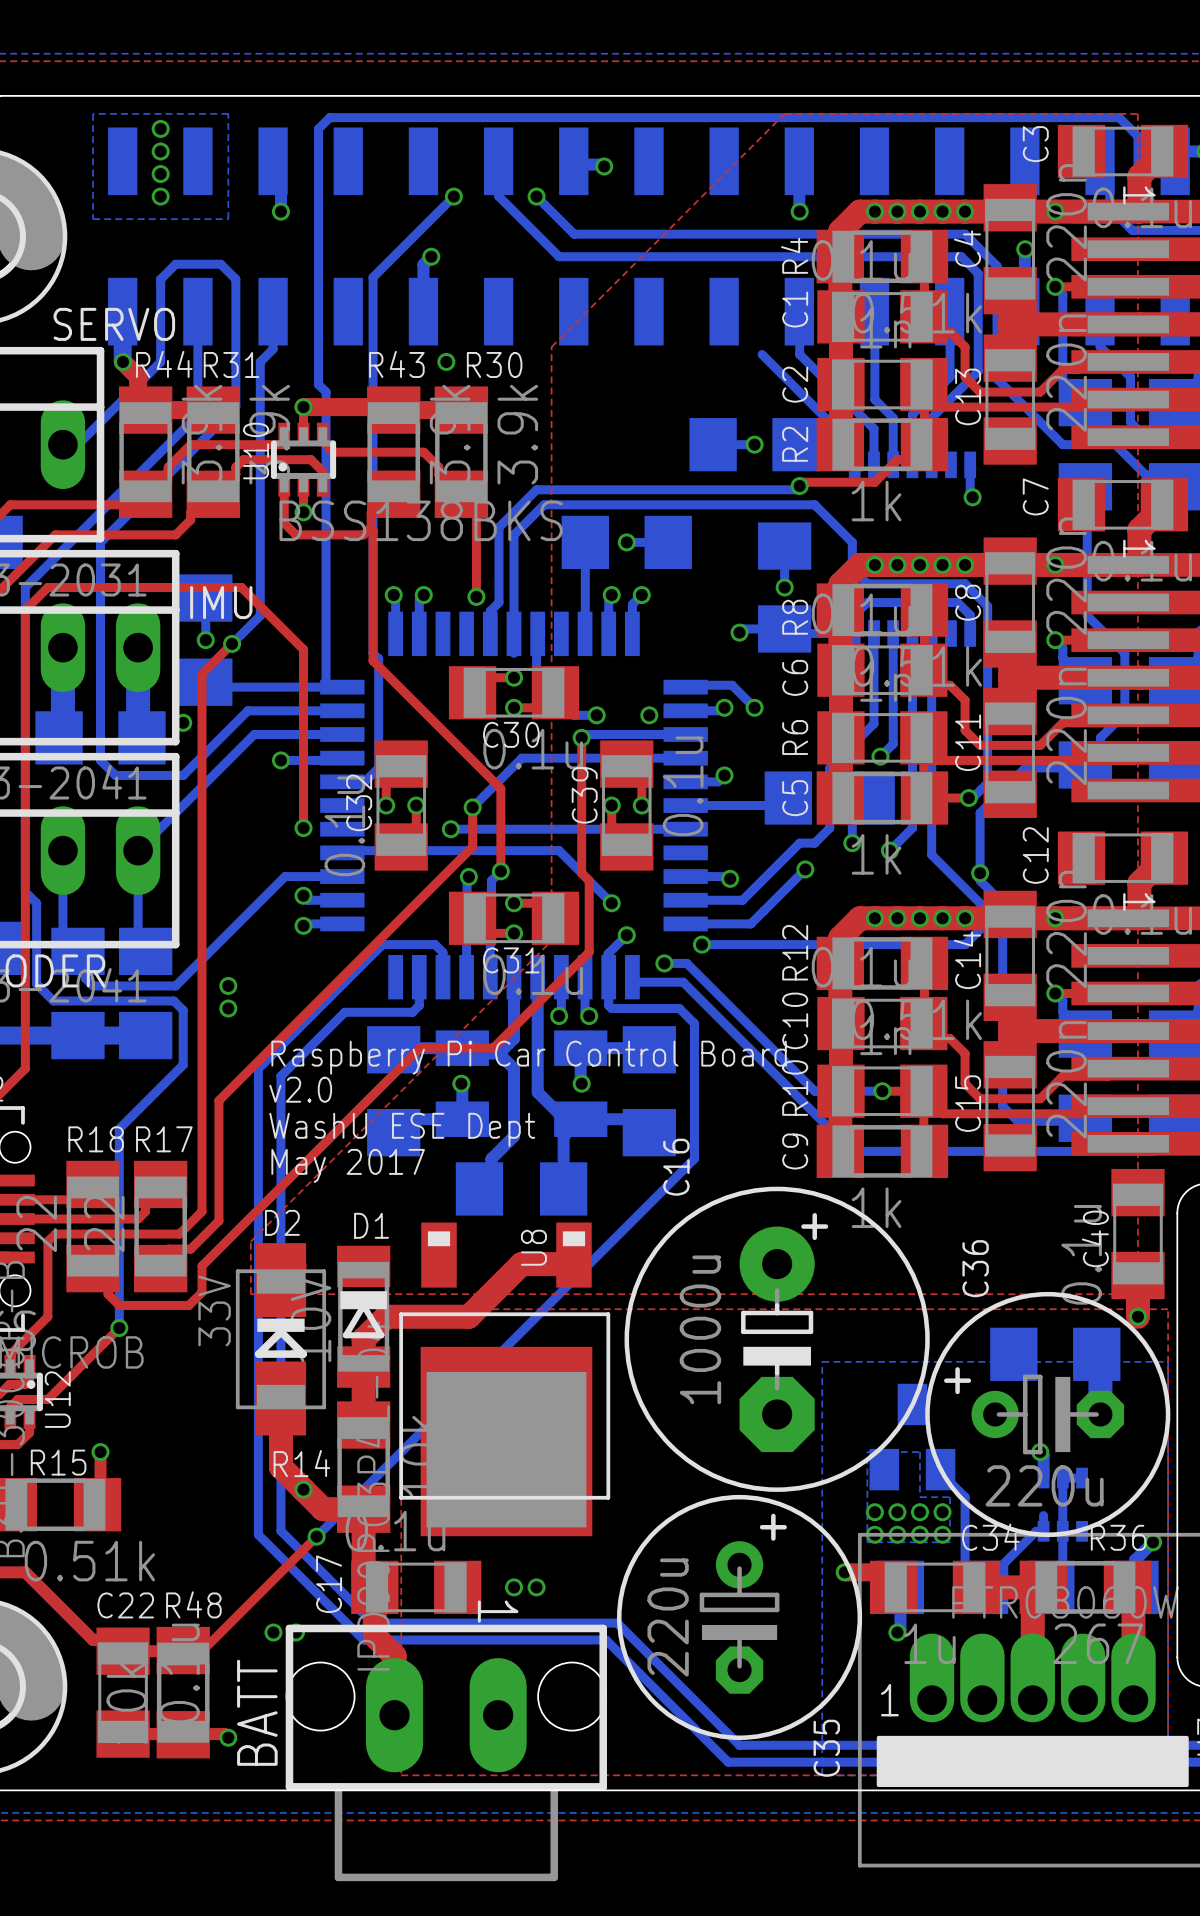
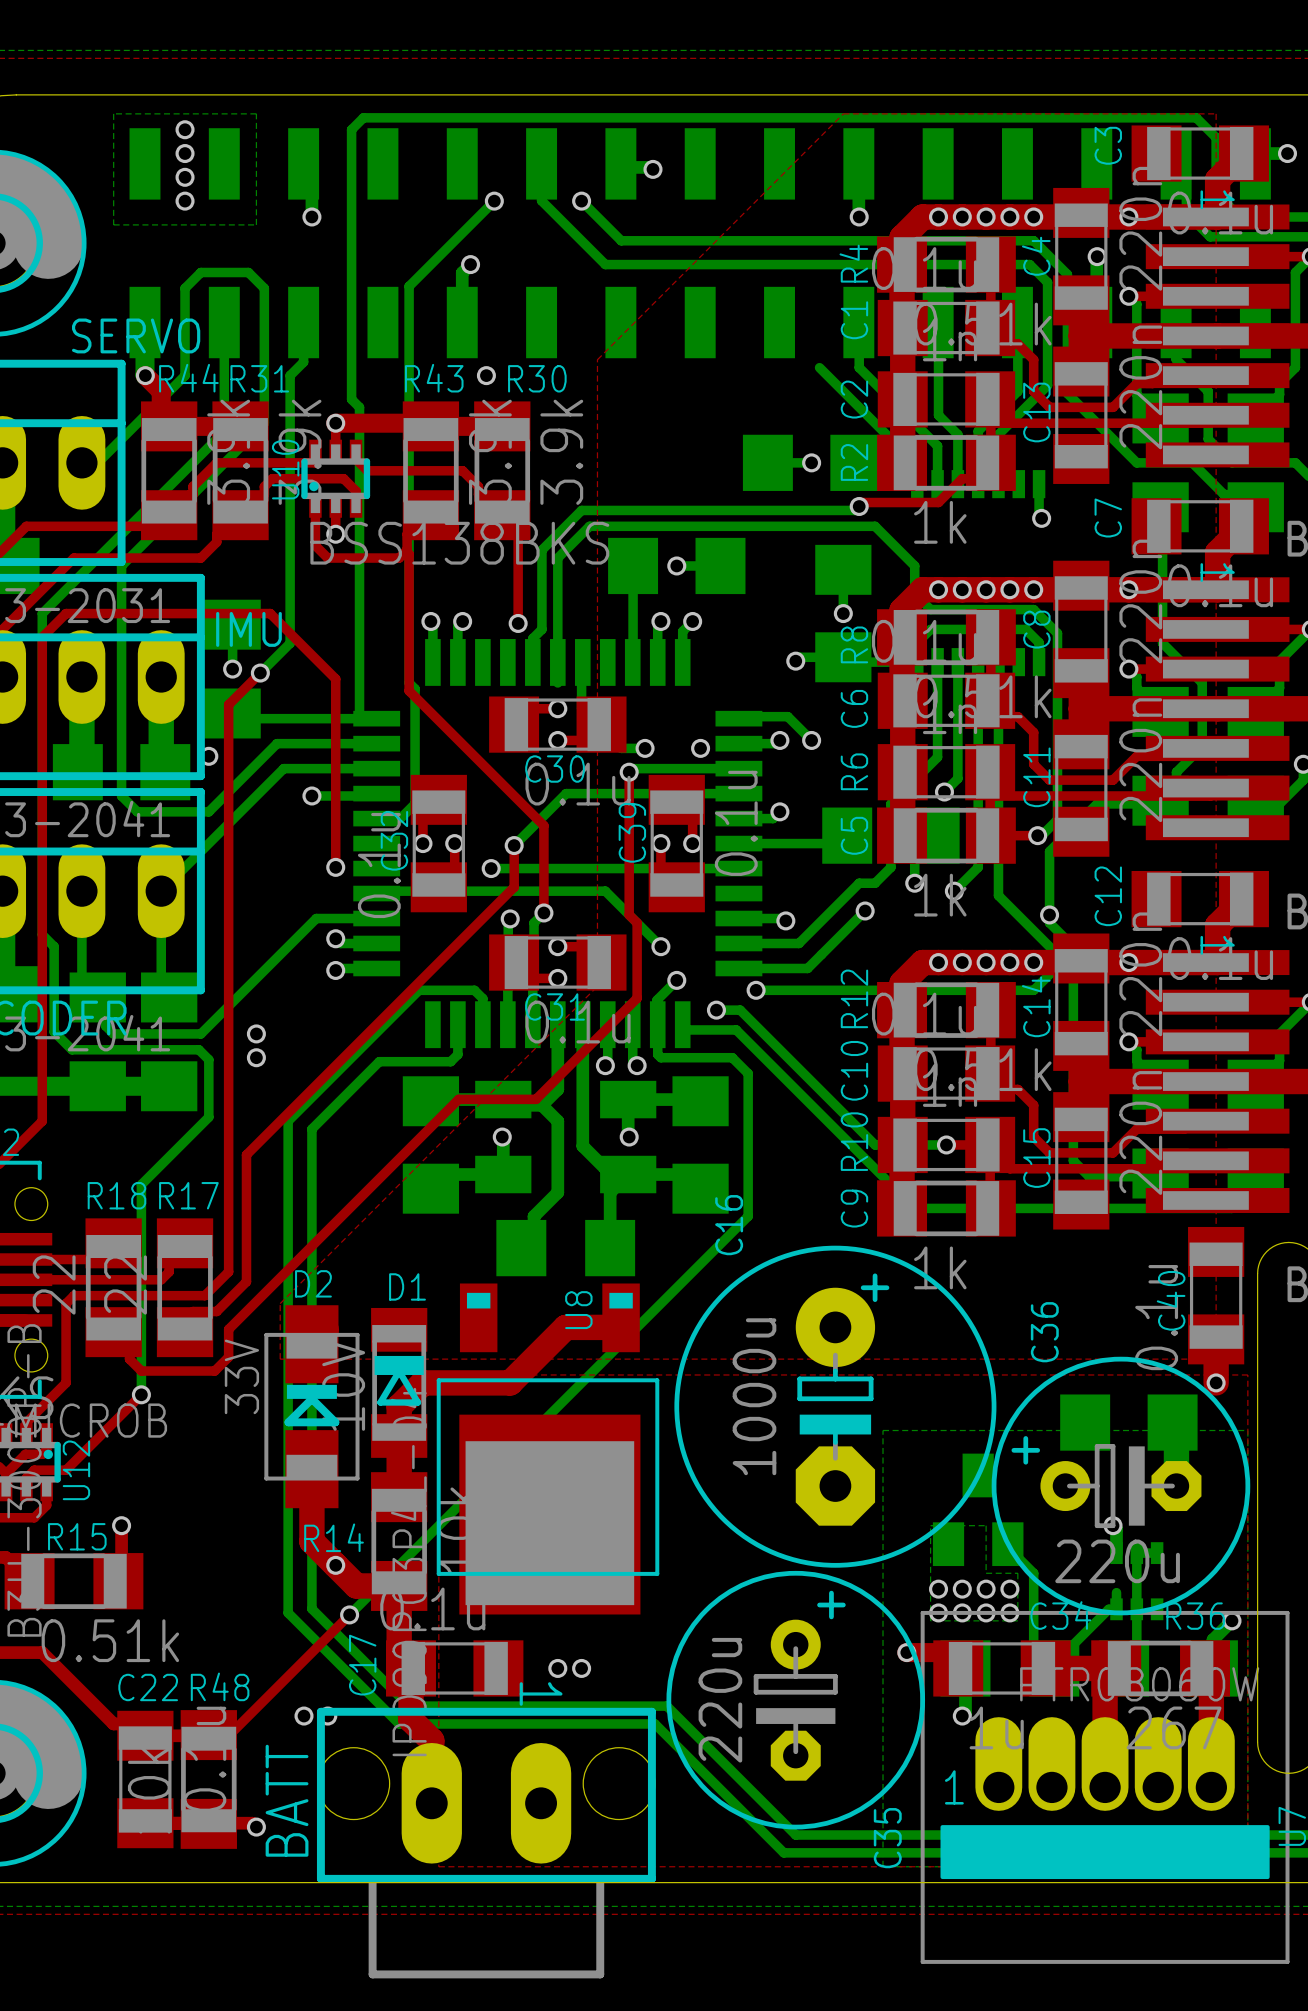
text: Raspberry Pi Car Control Board (529, 1057) -> none
text: v2.0 (300, 1089) -> none
text: WashU ESE Dept (402, 1129) -> none
text: May 2017 (348, 1165) -> none

